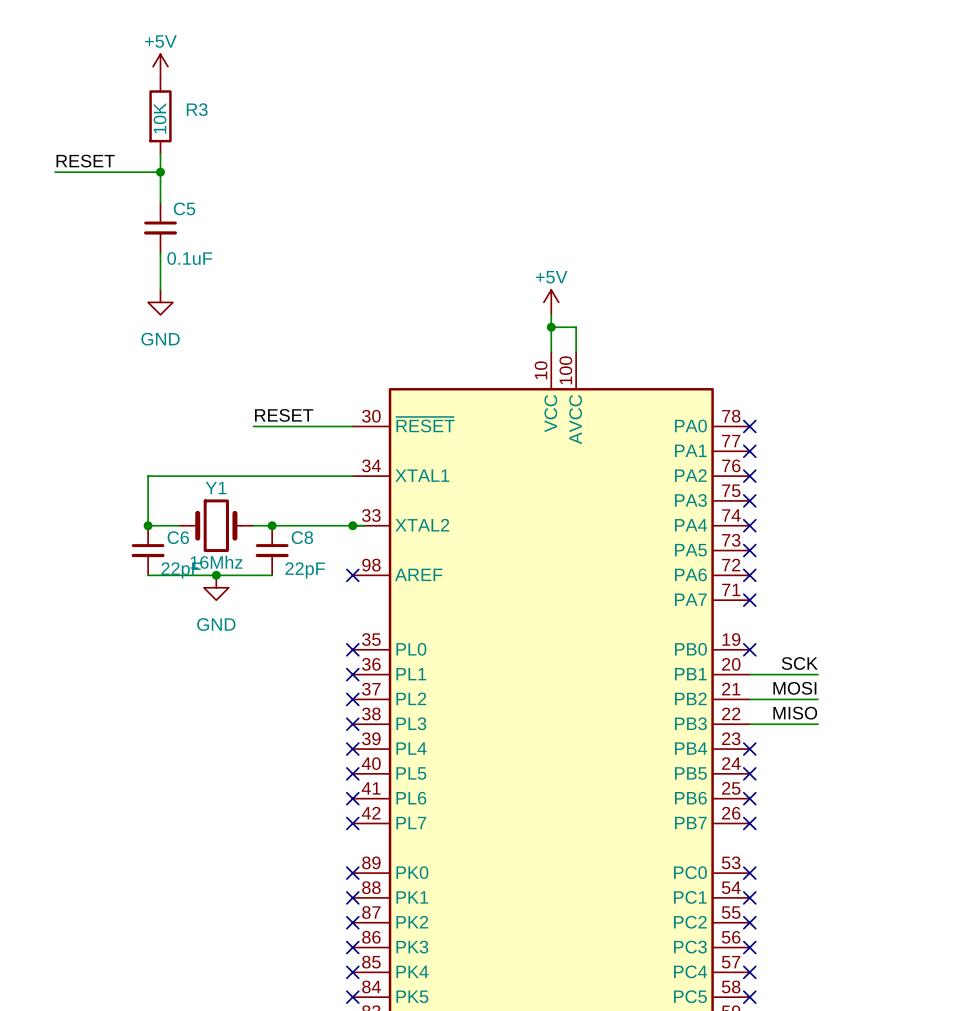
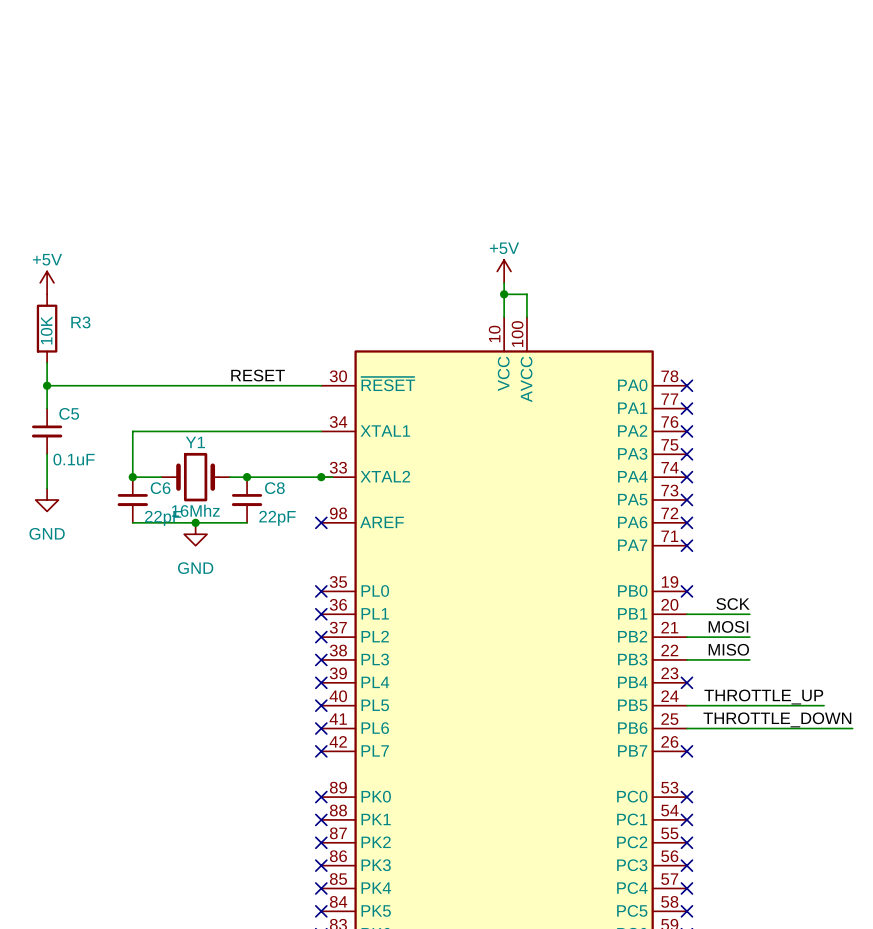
power symbol: +5V (160, 66) -> none
R3 position: (160, 116) -> (47, 328)
wire: (160, 153) (160, 203) -> none
label: RESET (85, 161) -> none
wire: (55, 172) (160, 172) -> none
junction: (160, 172) -> none
C5 position: (160, 227) -> (47, 431)
wire: (160, 252) (160, 290) -> none
power symbol: GND (160, 302) -> none
power symbol: none -> +5V (47, 282)
wire: none -> (47, 362) (47, 408)
wire: none -> (47, 385) (229, 385)
junction: none -> (47, 385)
wire: none -> (47, 454) (47, 488)
power symbol: none -> GND (47, 500)
label: none -> THROTTLE_UP (763, 697)
wire: none -> (686, 705) (824, 705)
no-connect mark: (749, 773) -> none
label: none -> THROTTLE_DOWN (777, 719)
wire: none -> (686, 728) (852, 728)
no-connect mark: (749, 798) -> none

